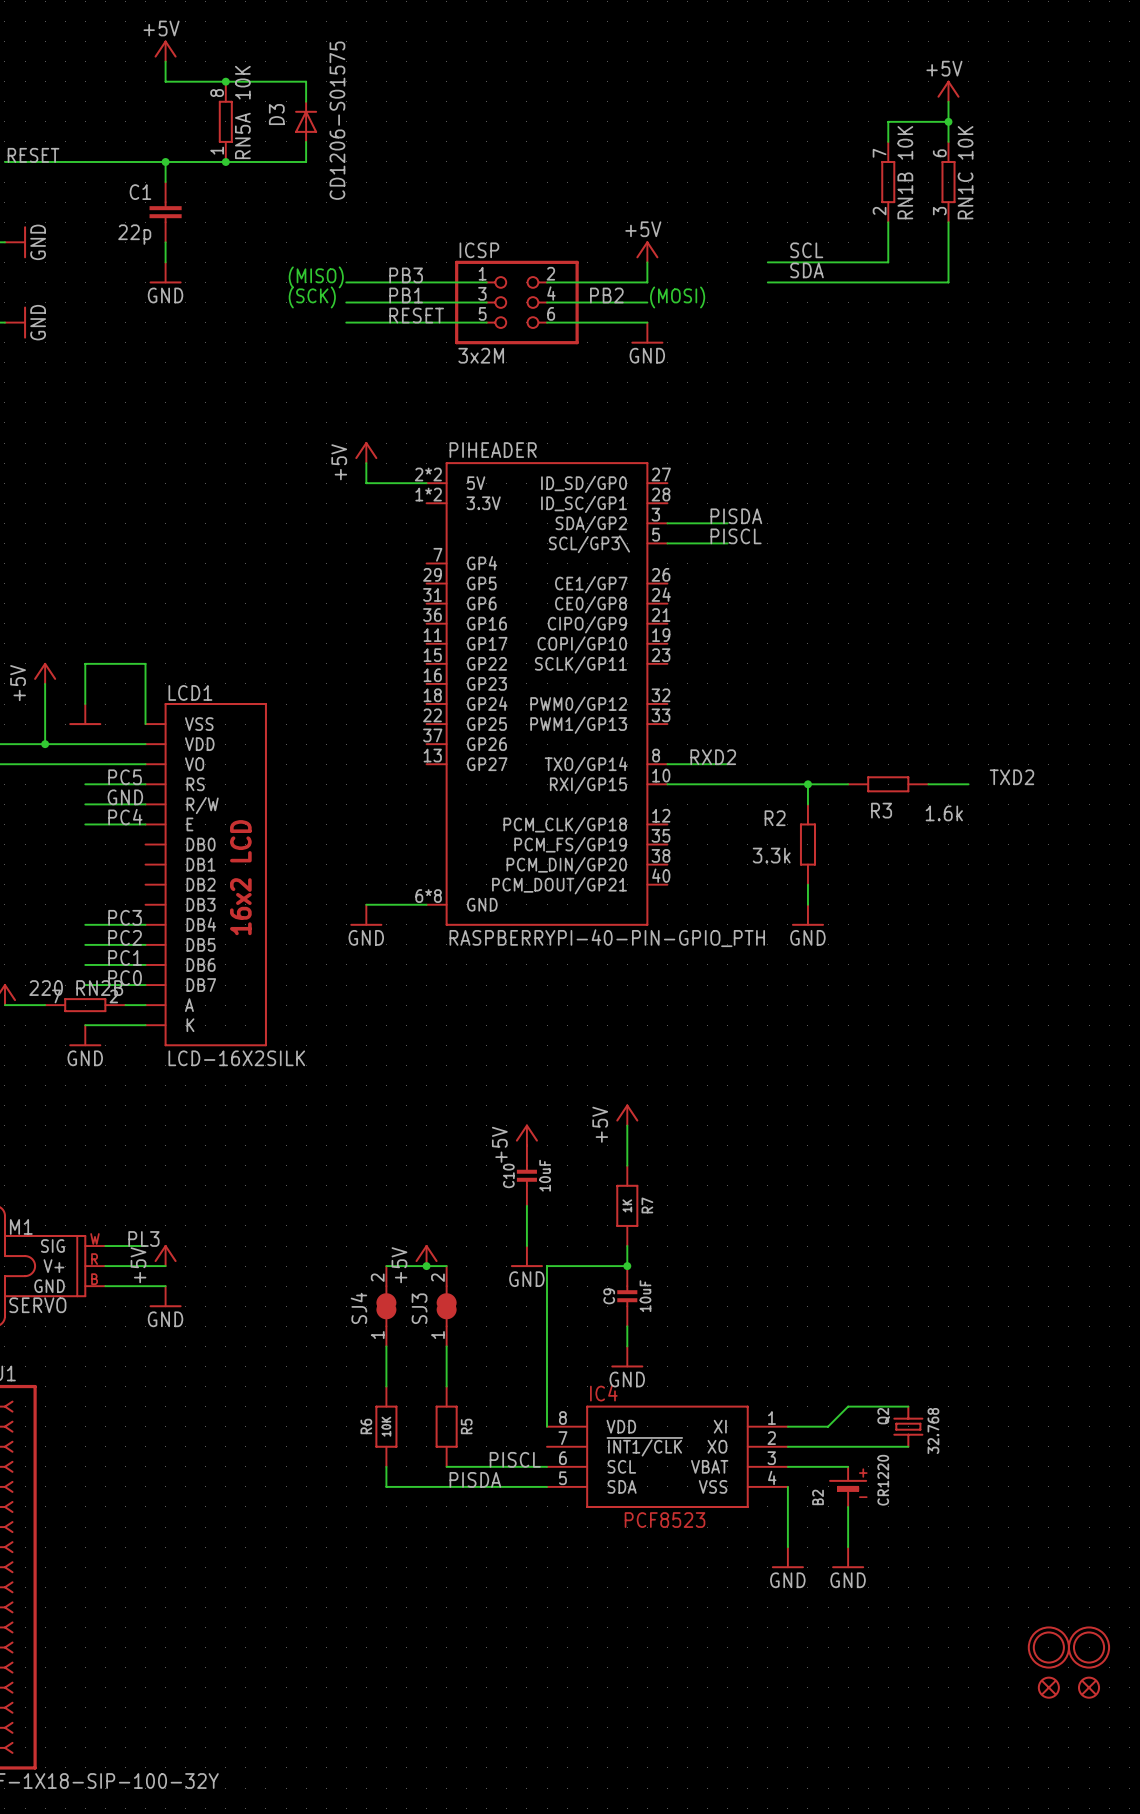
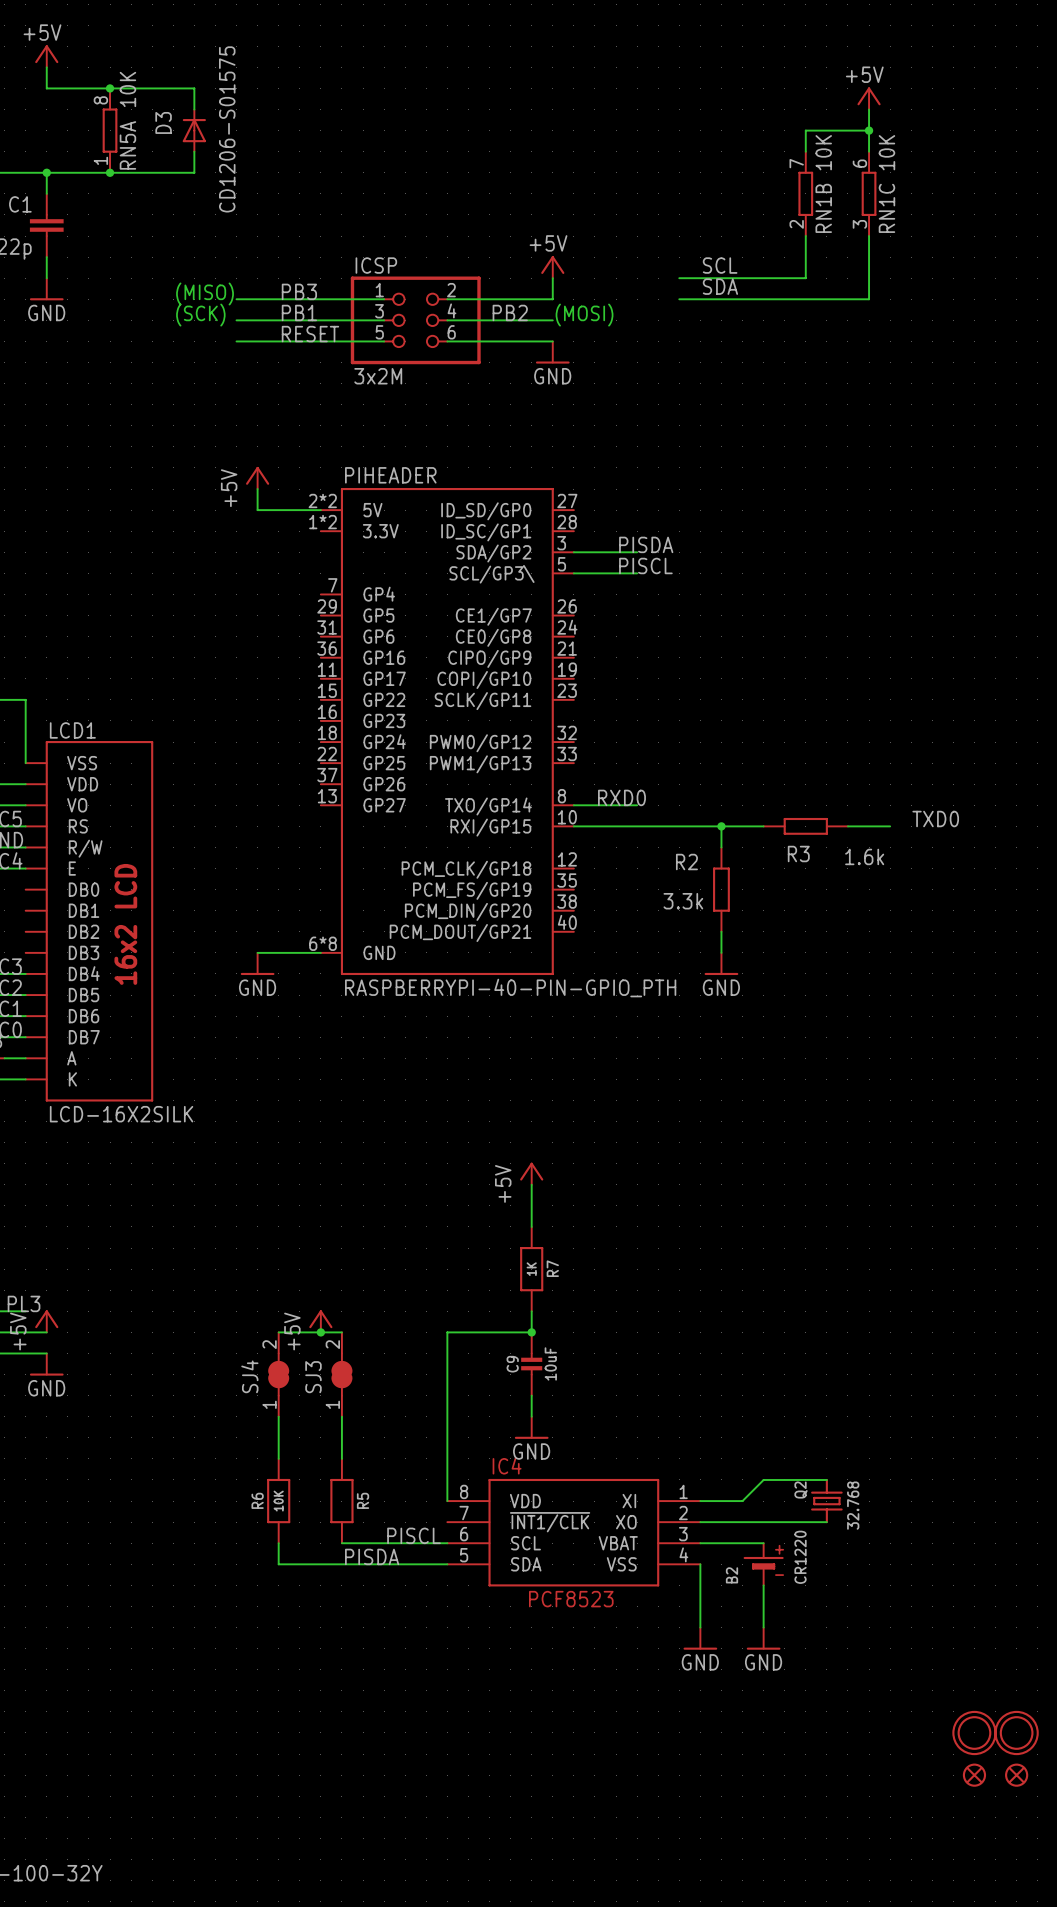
label: RXD2 (713, 757) -> RXD0 (621, 797)
label: TXD2 (1011, 777) -> TXD0 (935, 819)
power symbol: +5V (526, 1135) -> none
C10: 10uF (526, 1175) -> none
wire: (526, 1205) (526, 1246) -> none
power symbol: GND (526, 1256) -> none

